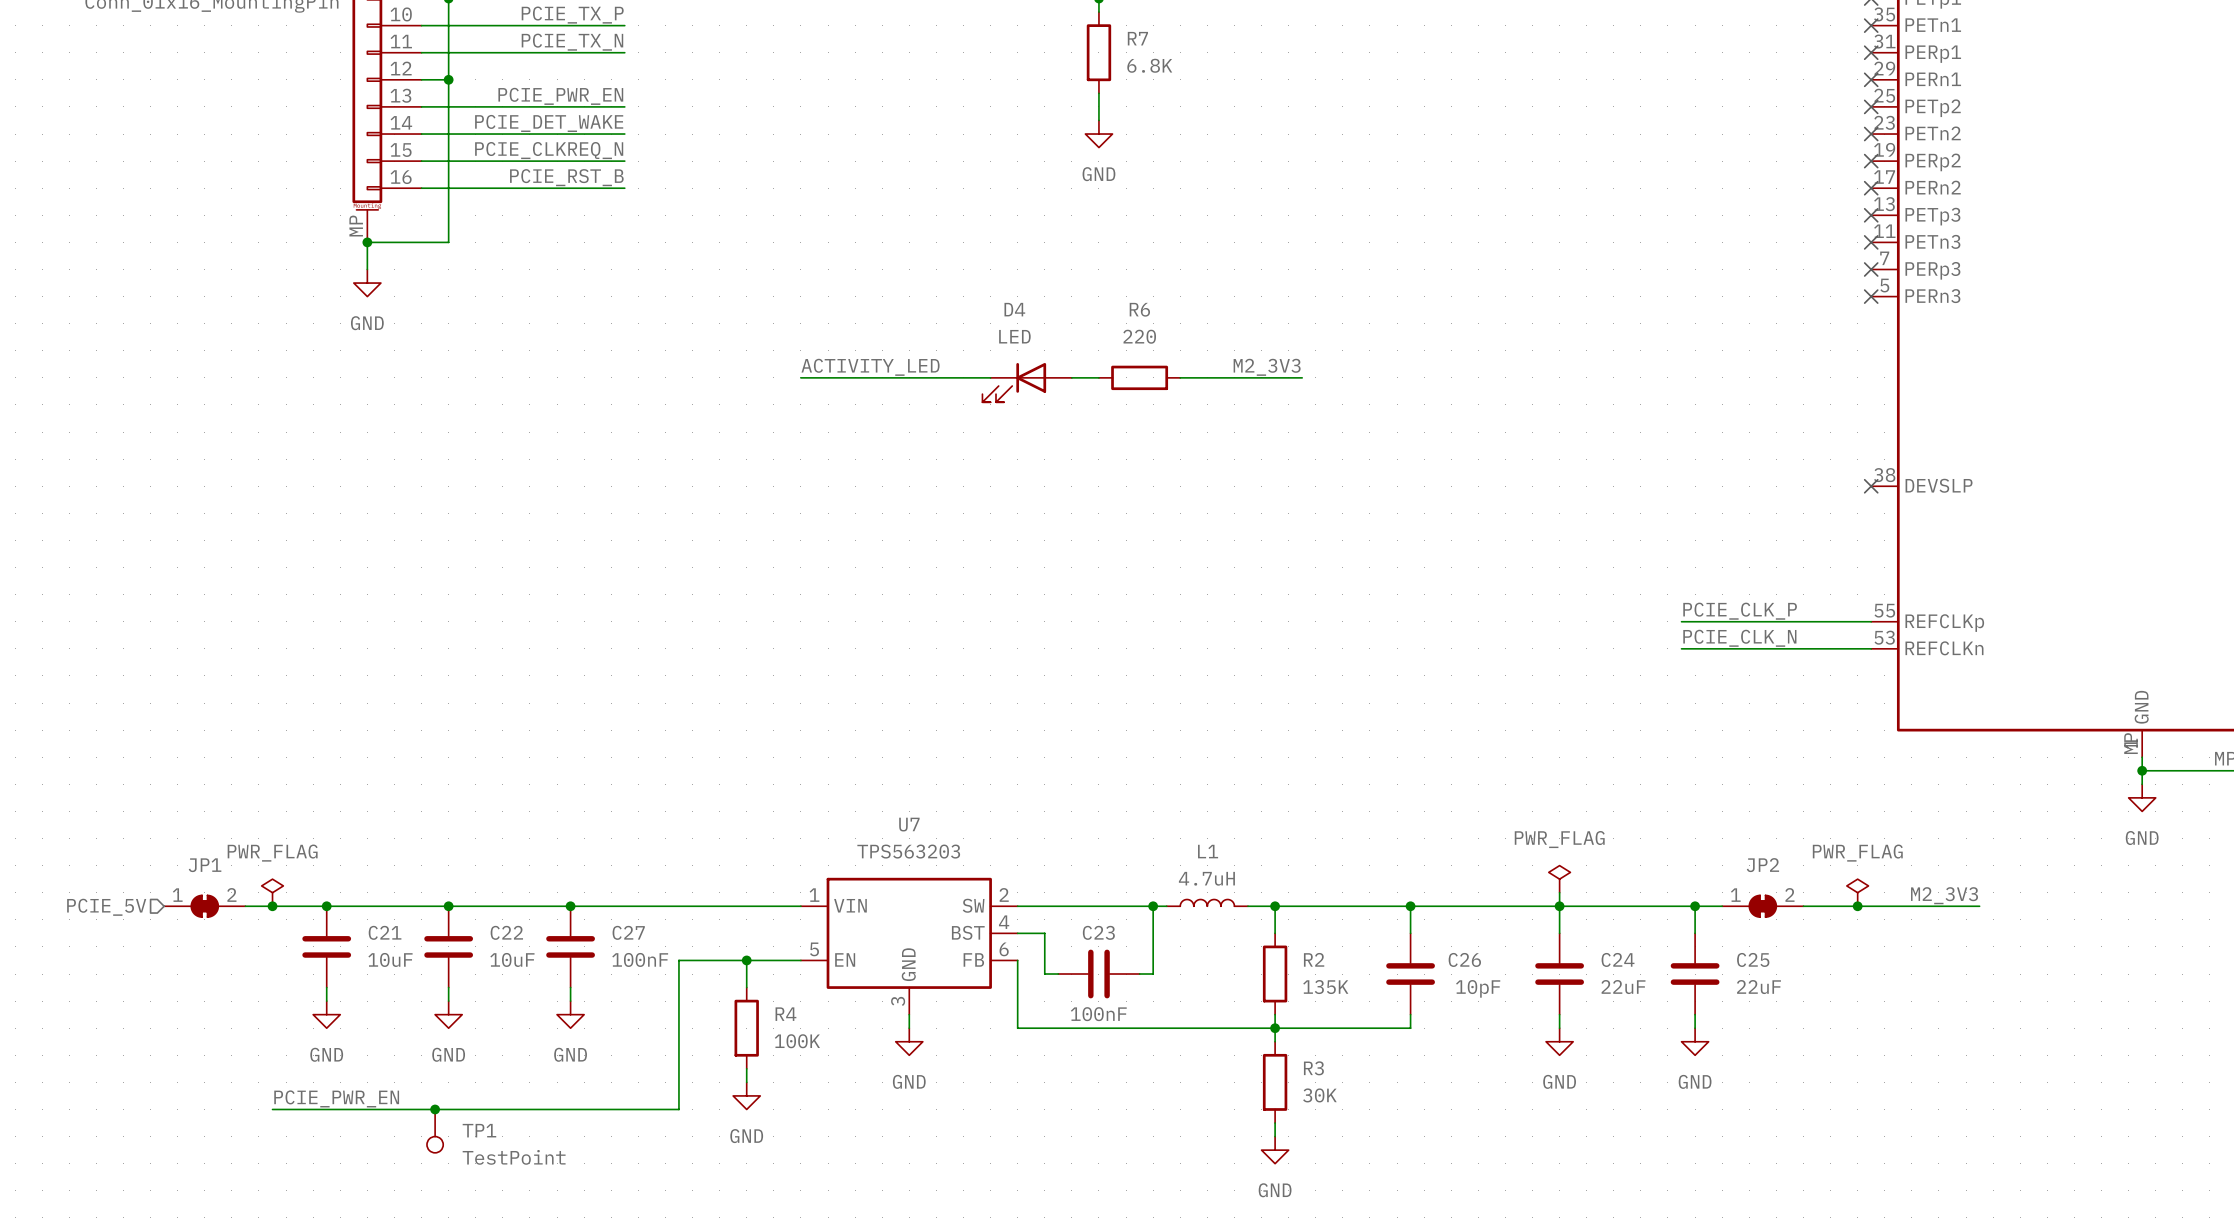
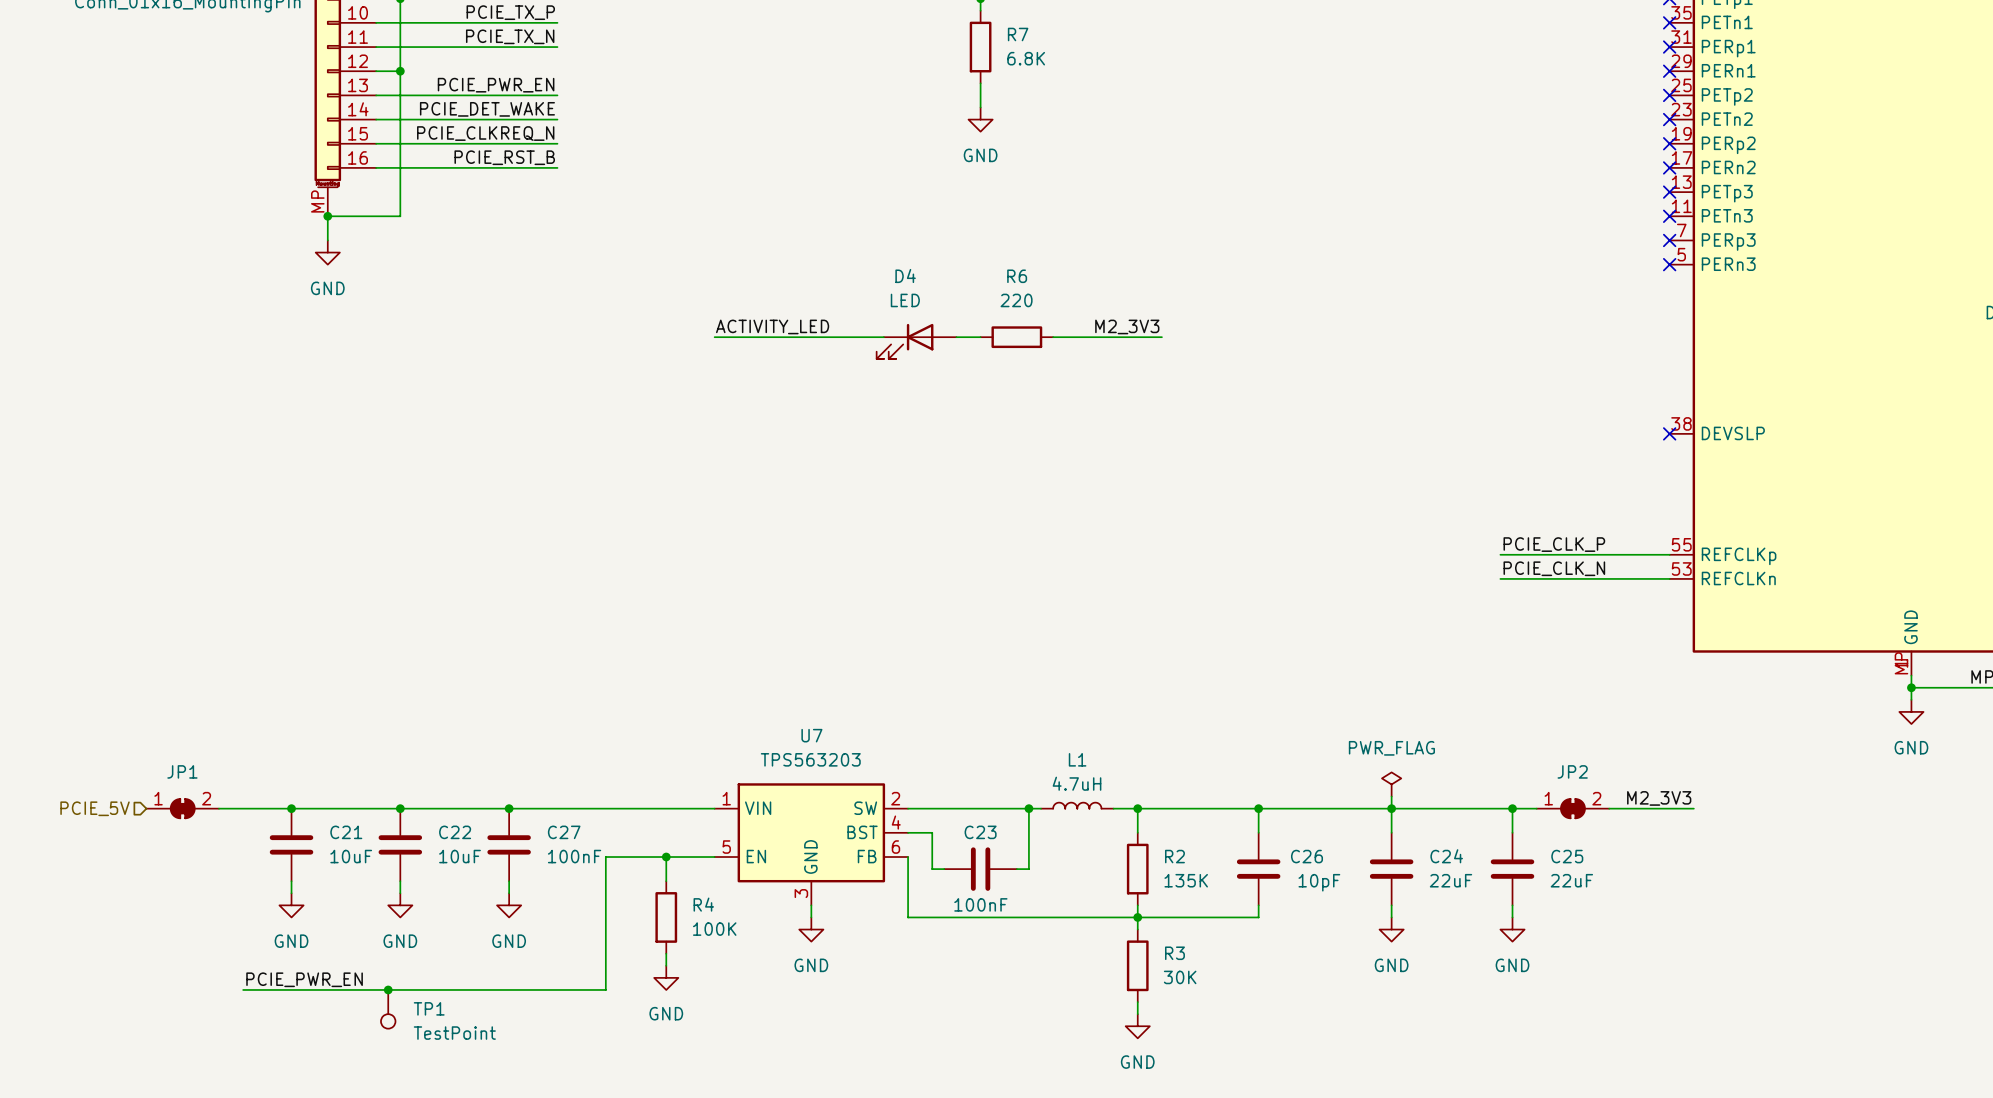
power symbol: PWR_FLAG (272, 892) -> none
power symbol: PWR_FLAG (1857, 892) -> none
label position: M2_3V3 (1944, 895) -> M2_3V3 (1659, 798)
junction: (272, 906) -> none
junction: (1857, 906) -> none
wire: (1898, 906) (1979, 906) -> none

